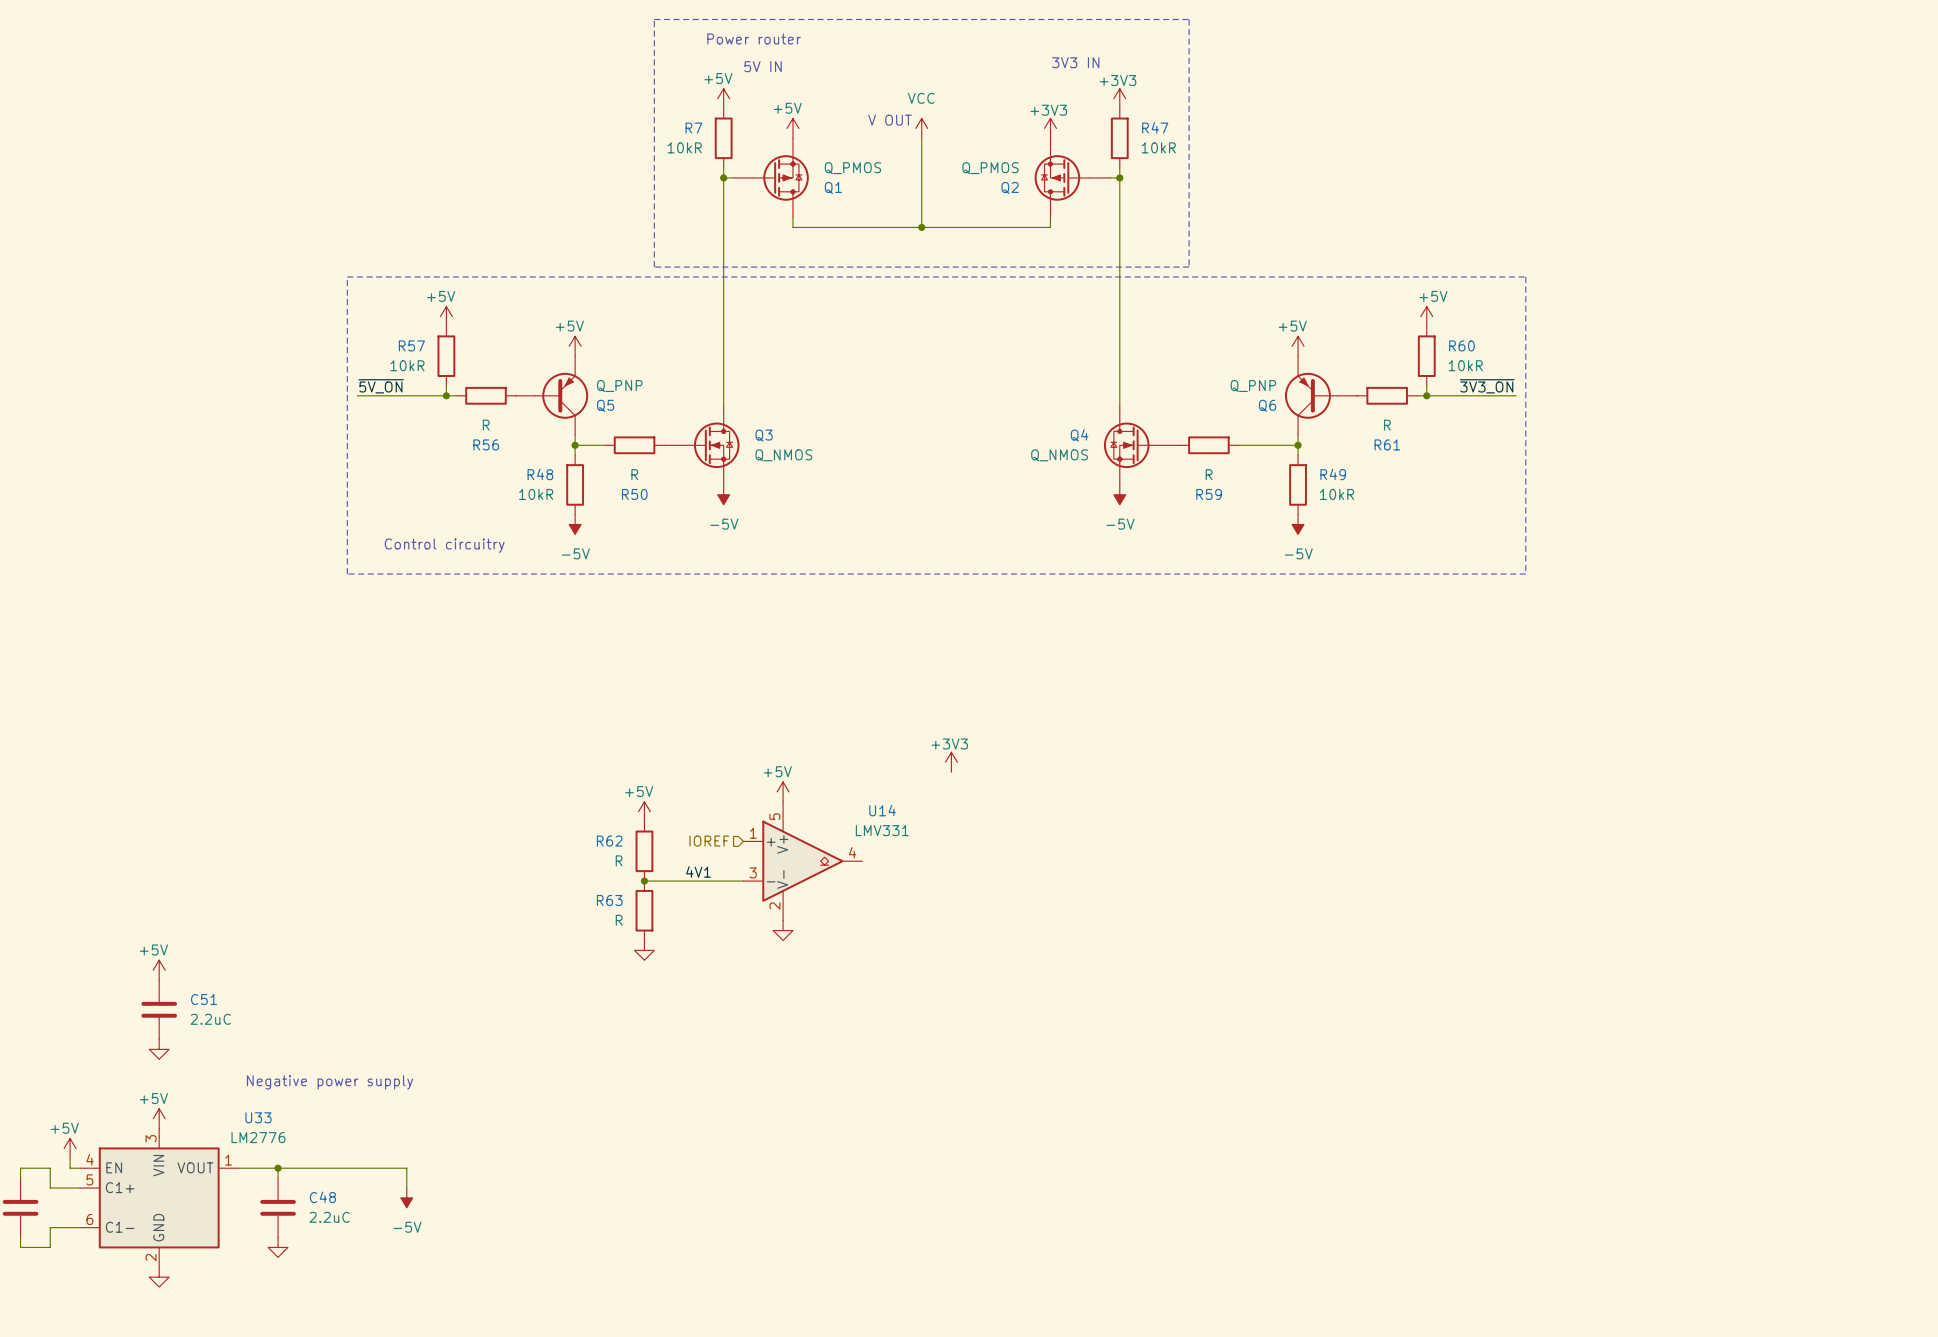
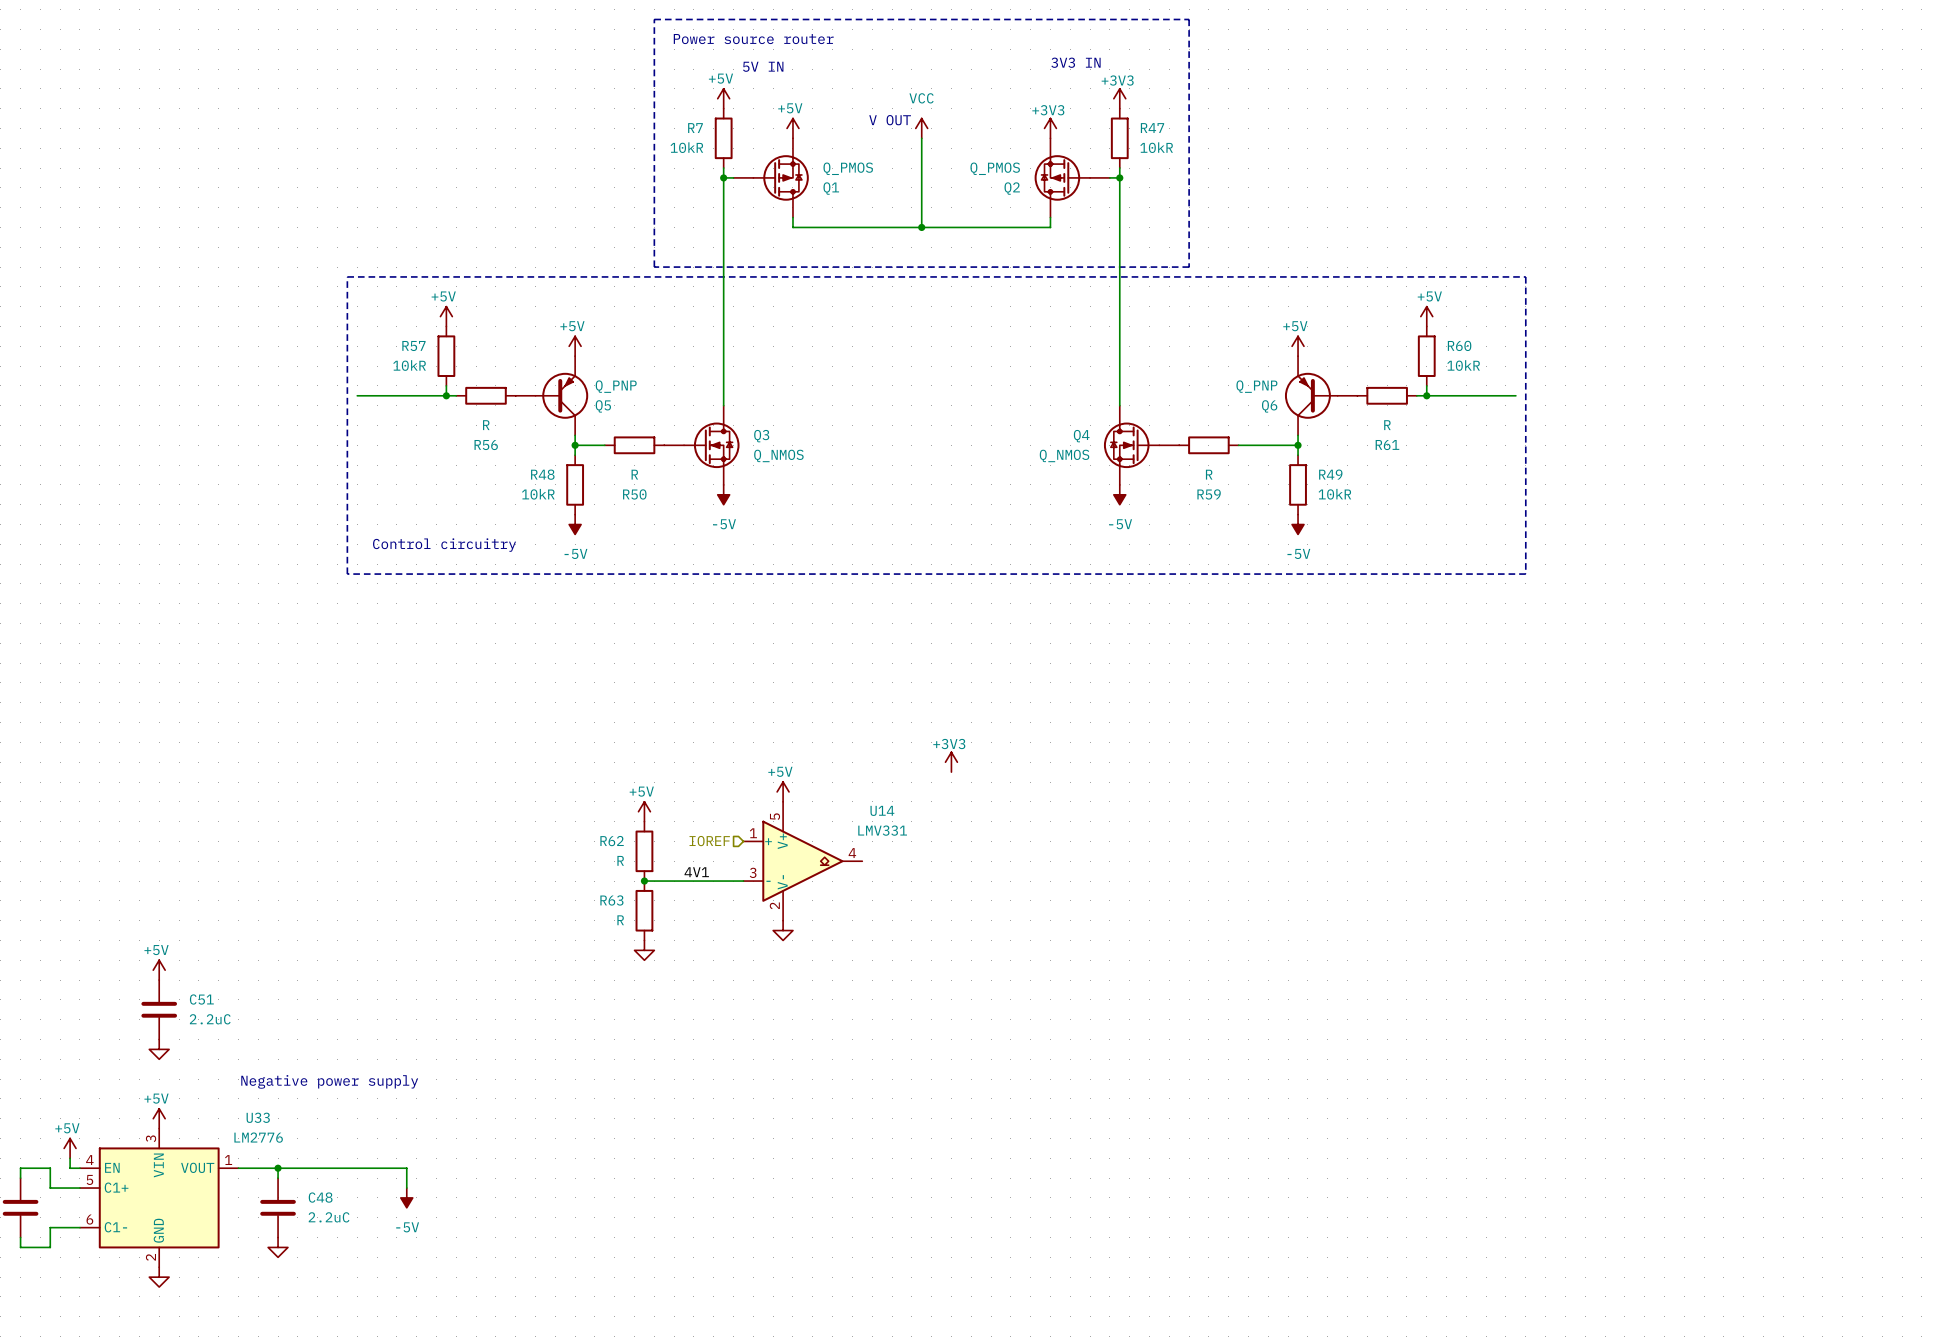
text: Power router (754, 38) -> Power source router (753, 39)
label: ~{5V_ON} (381, 386) -> none
label: ~{3V3_ON} (1487, 386) -> none

